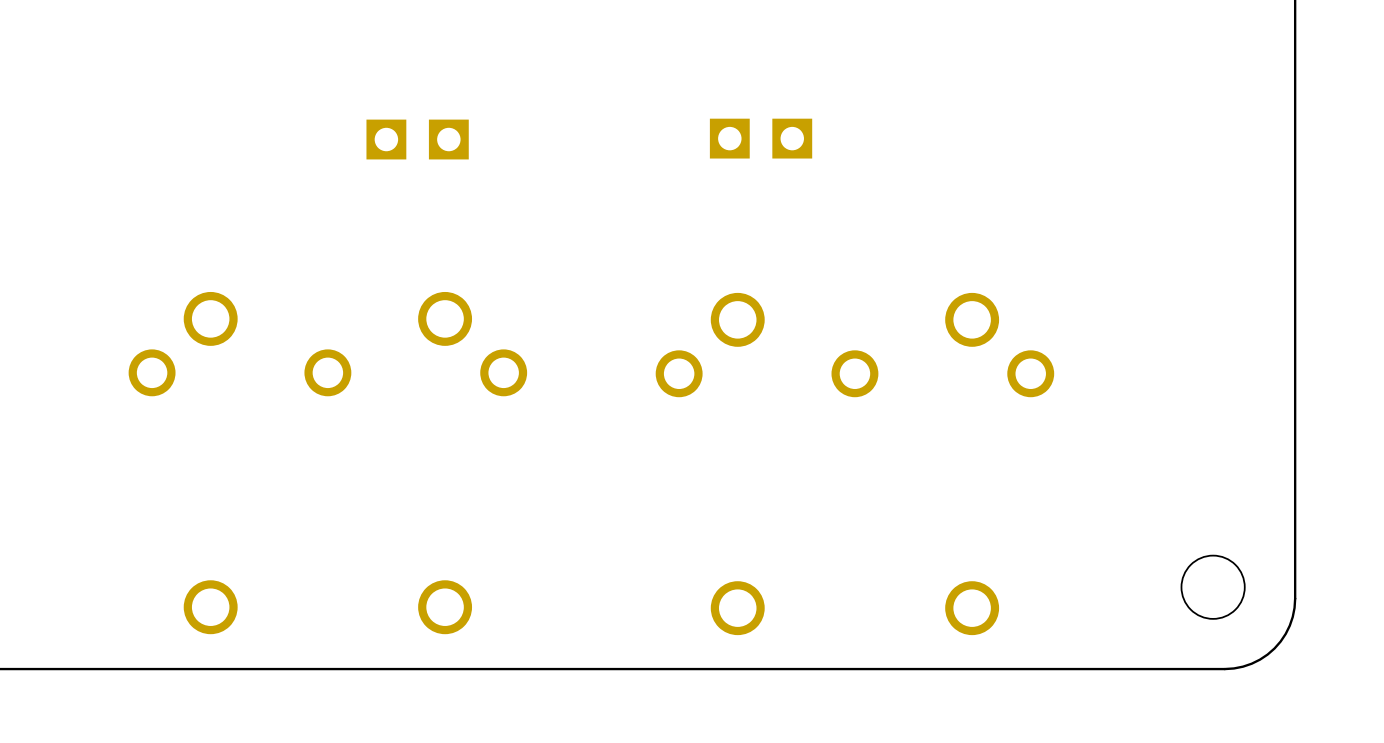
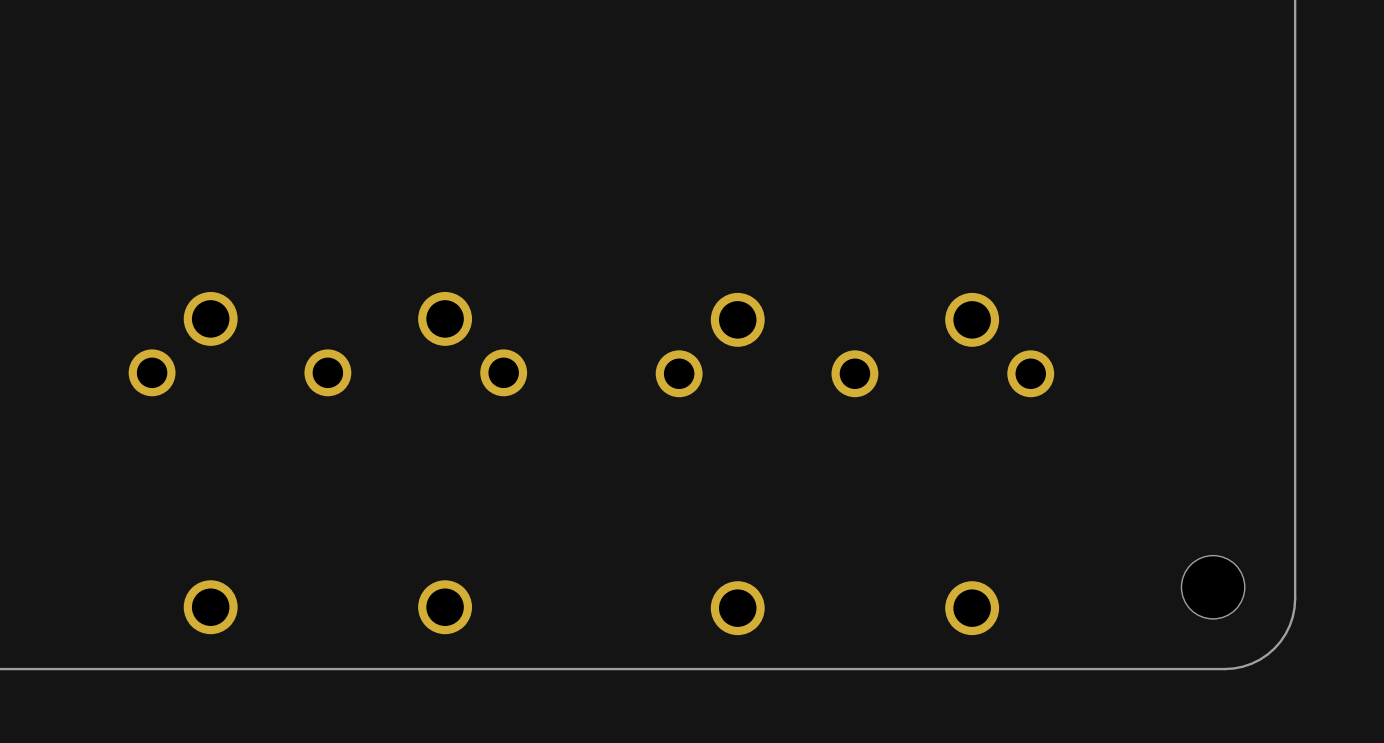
part: (729, 138) -> none
part: (792, 138) -> none
part: (386, 139) -> none
part: (448, 139) -> none

